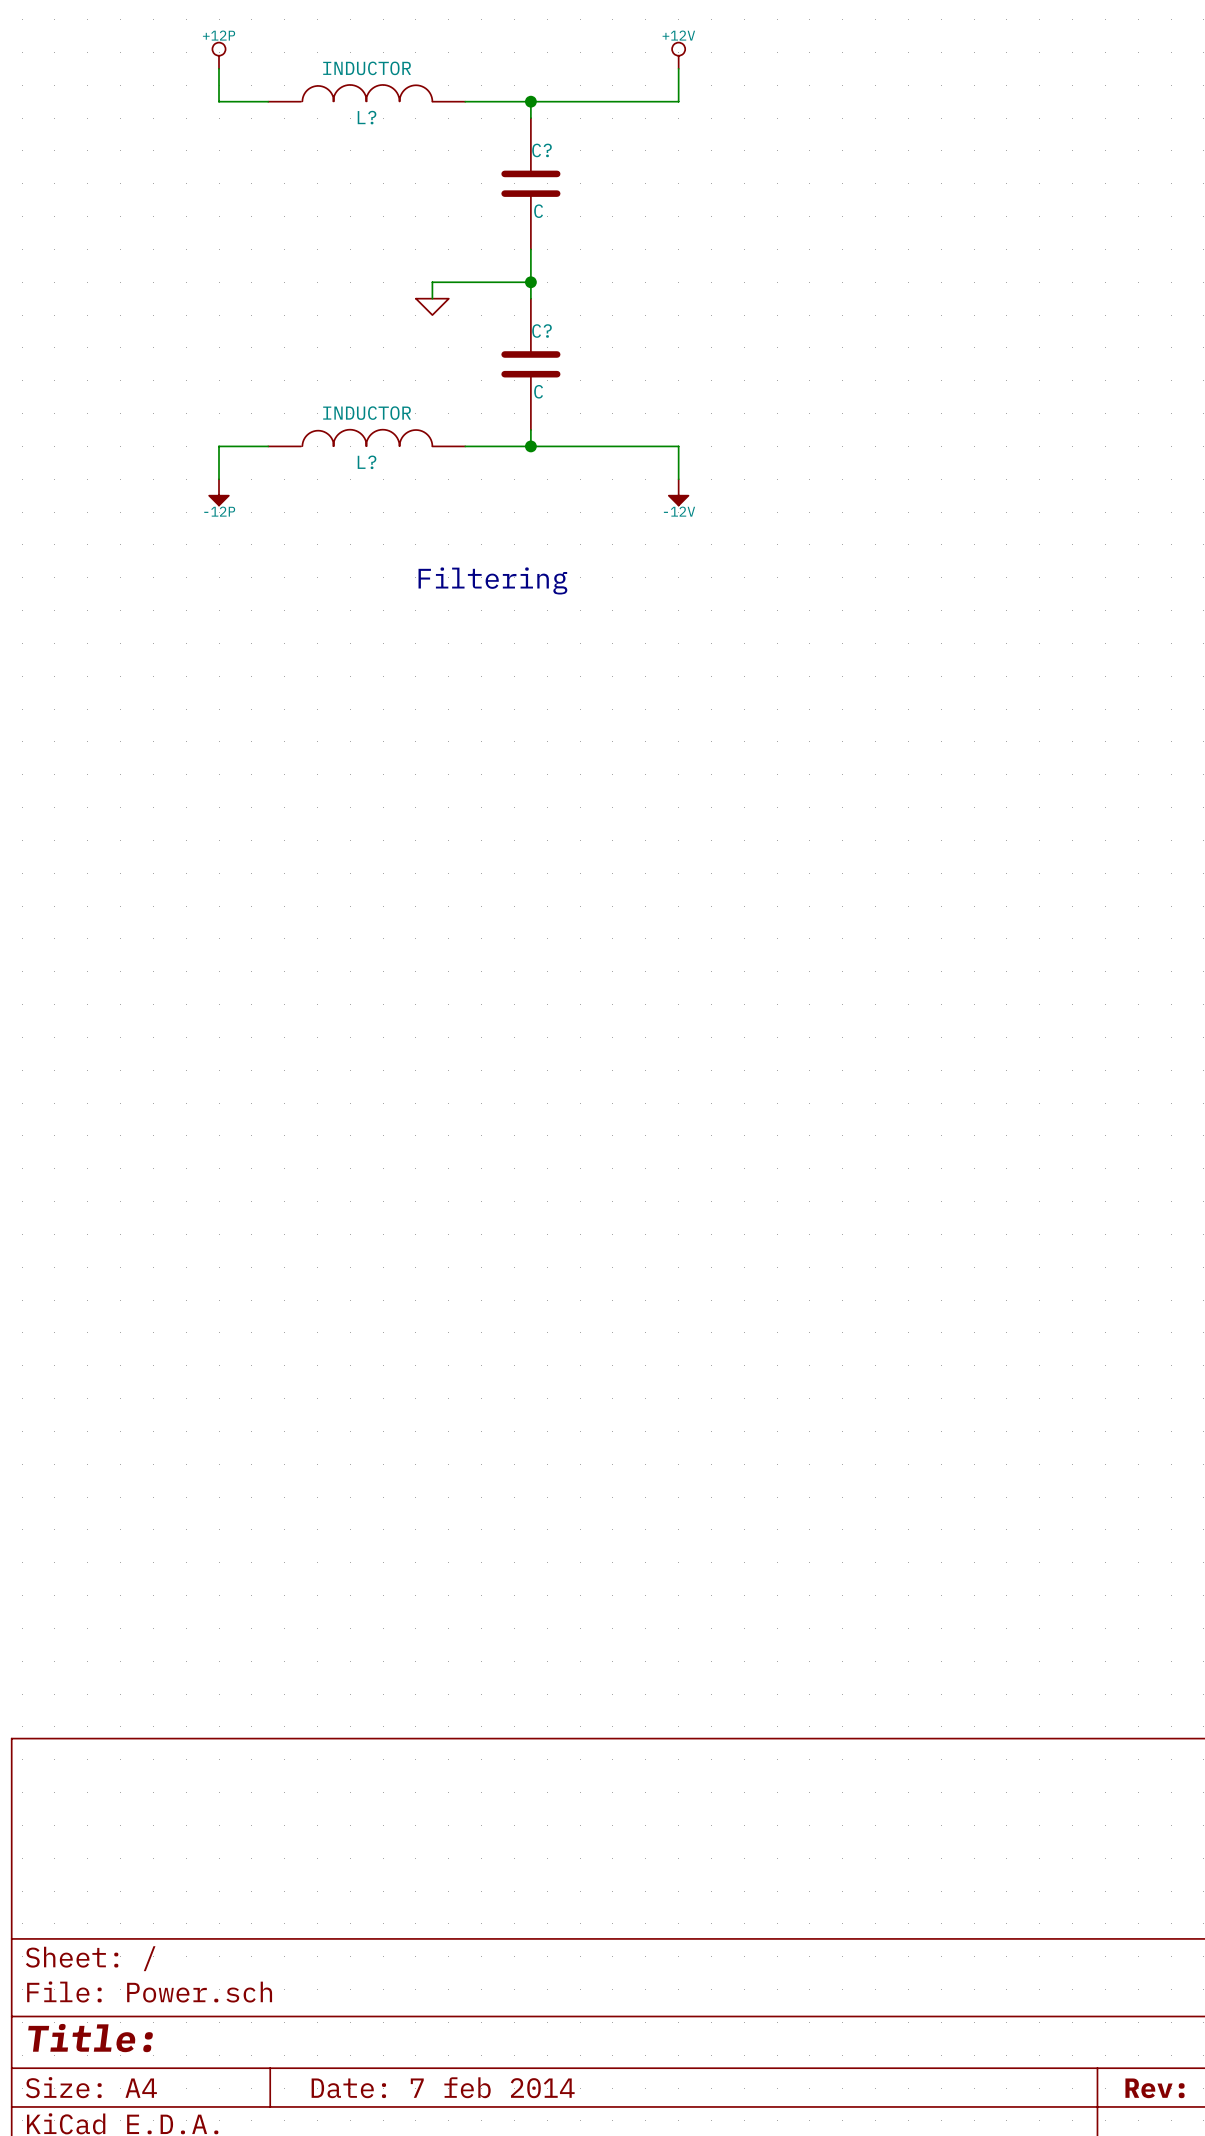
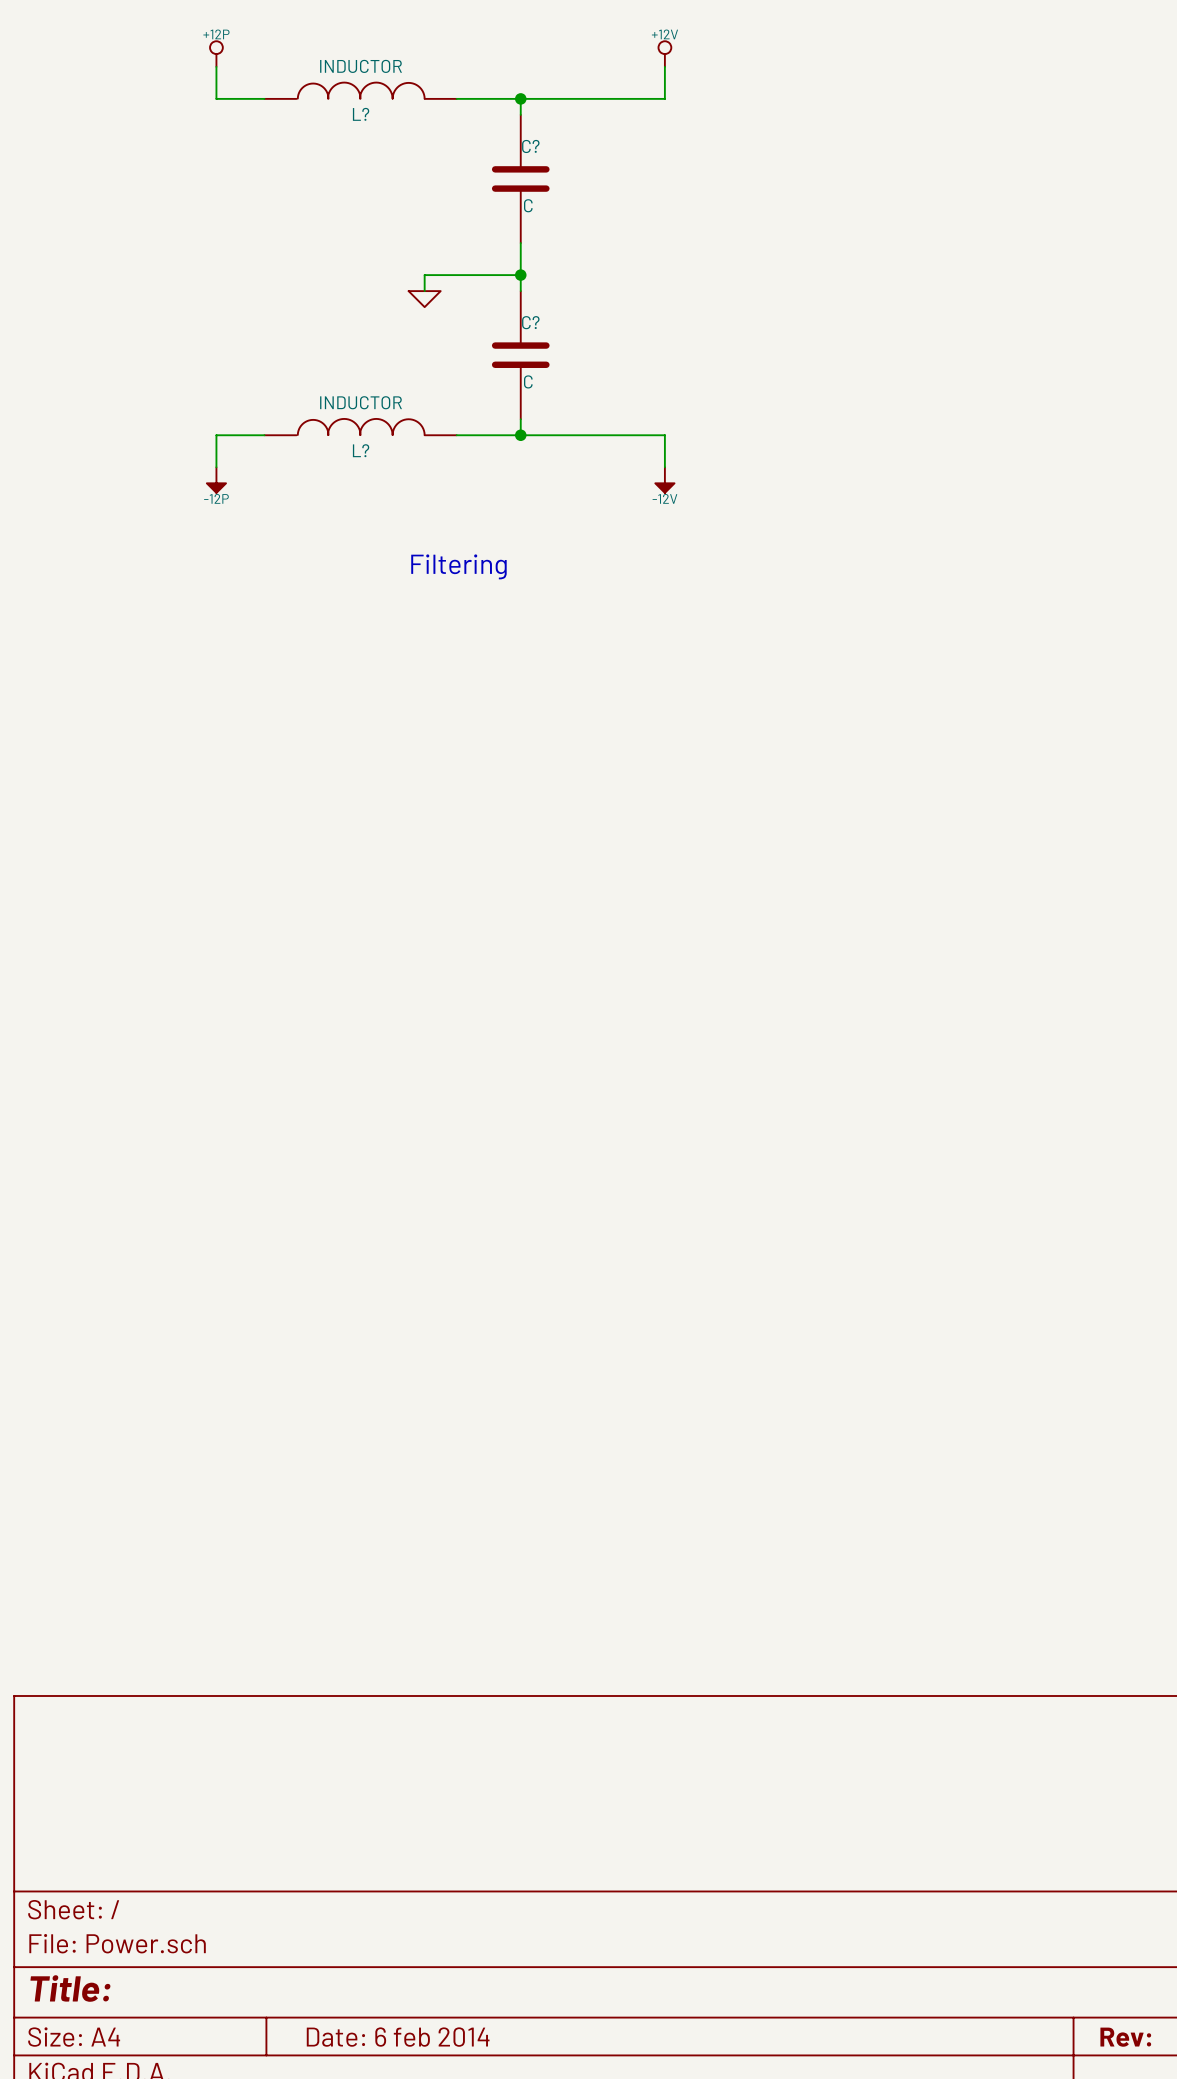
title block: Date: 7 feb 2014 (443, 2087) -> Date: 6 feb 2014 (398, 2037)

